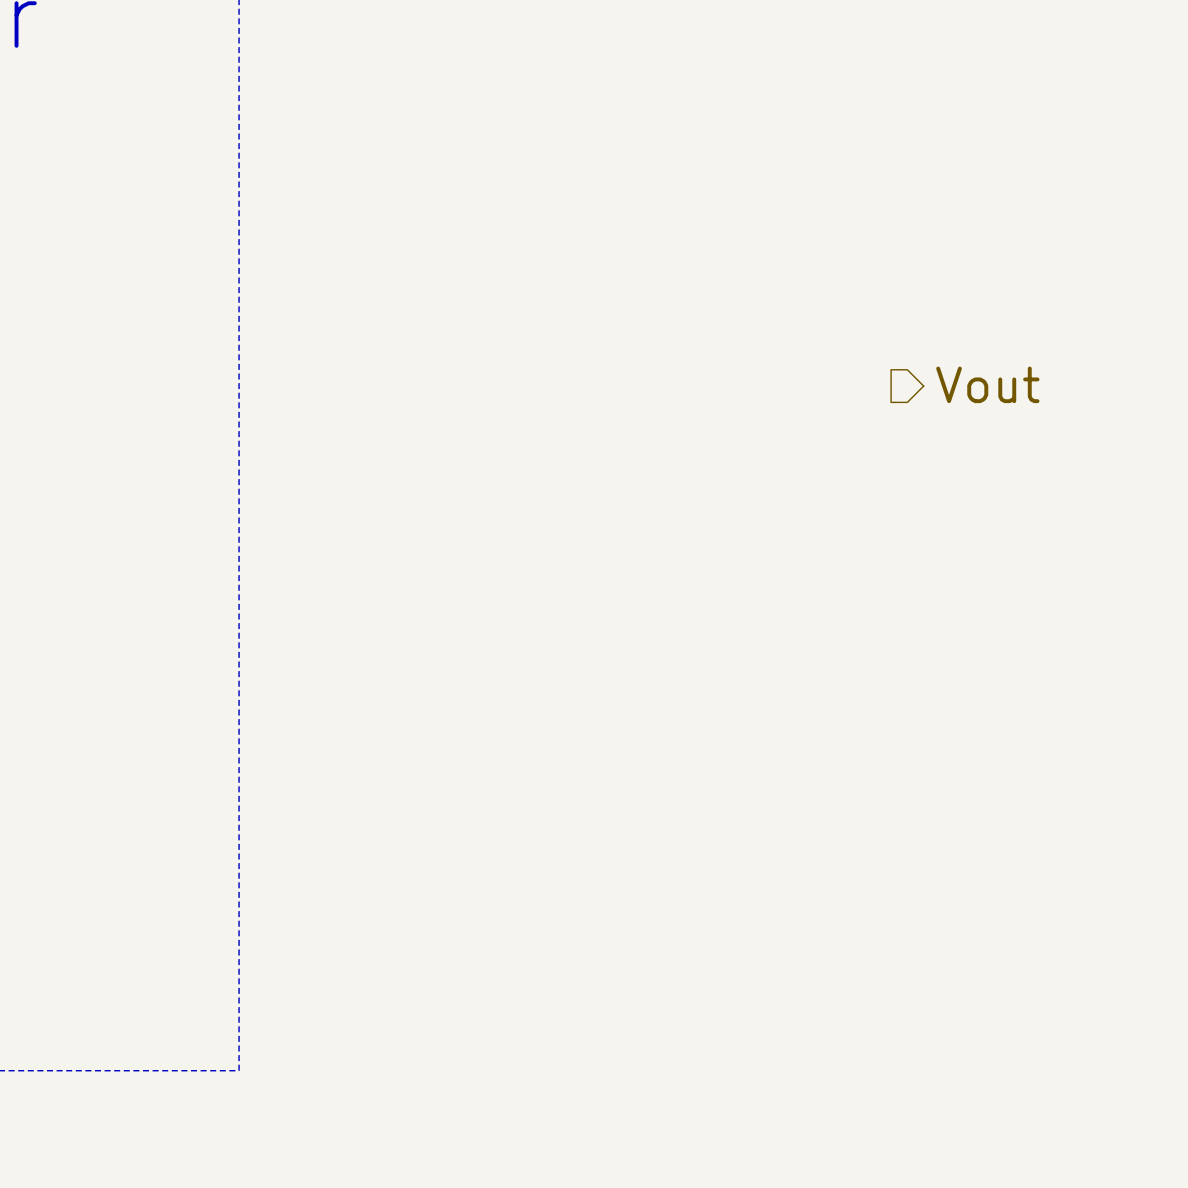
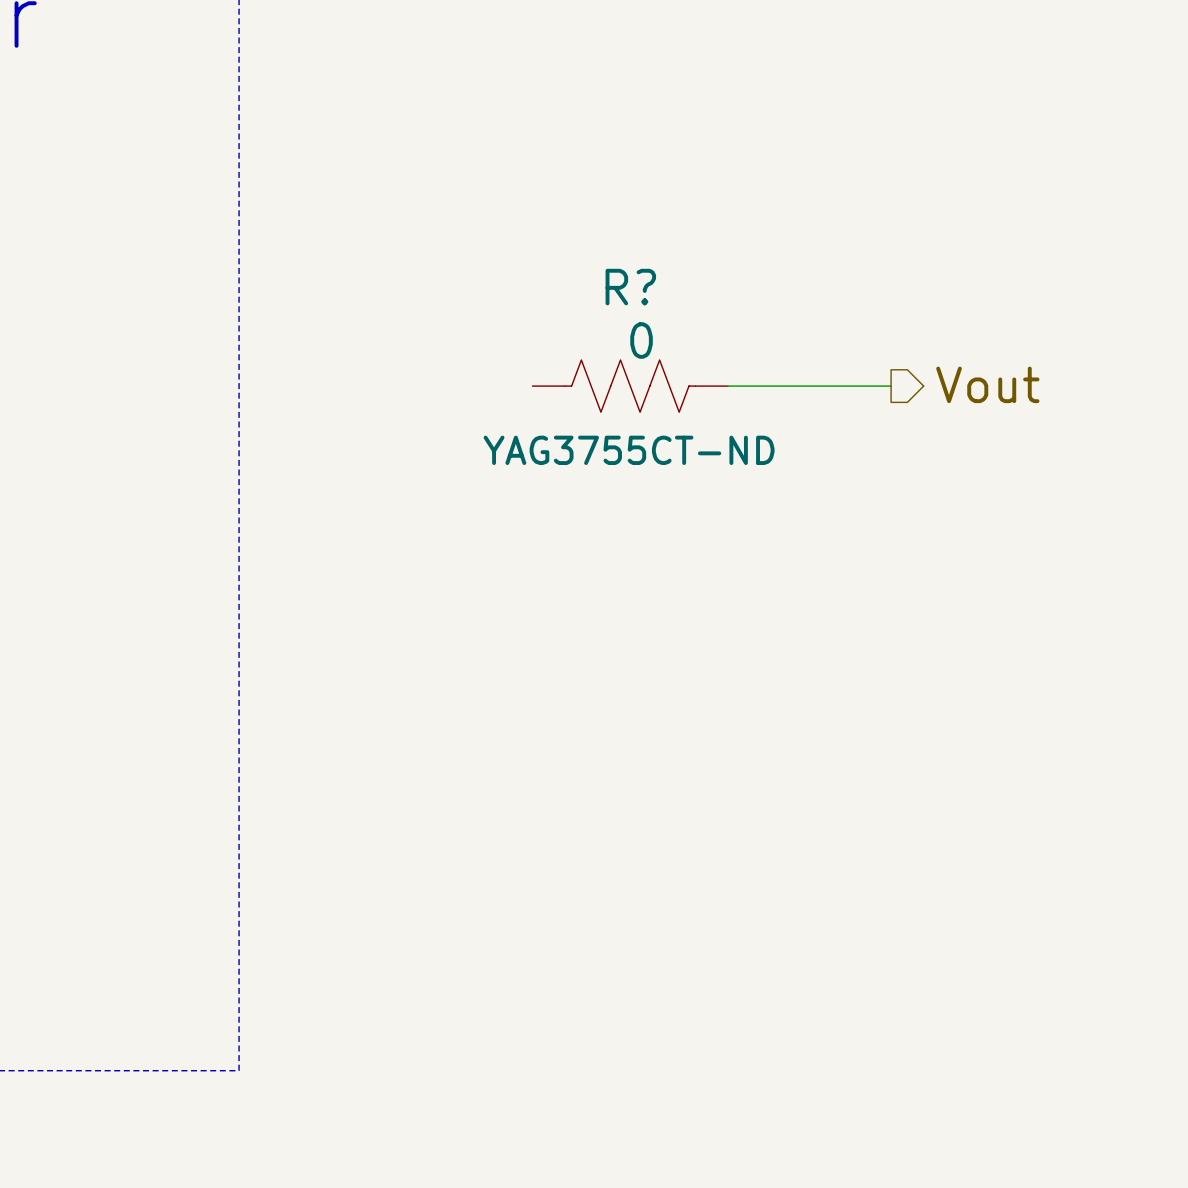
R?: none -> 0 (630, 386)
wire: none -> (728, 386) (891, 386)

